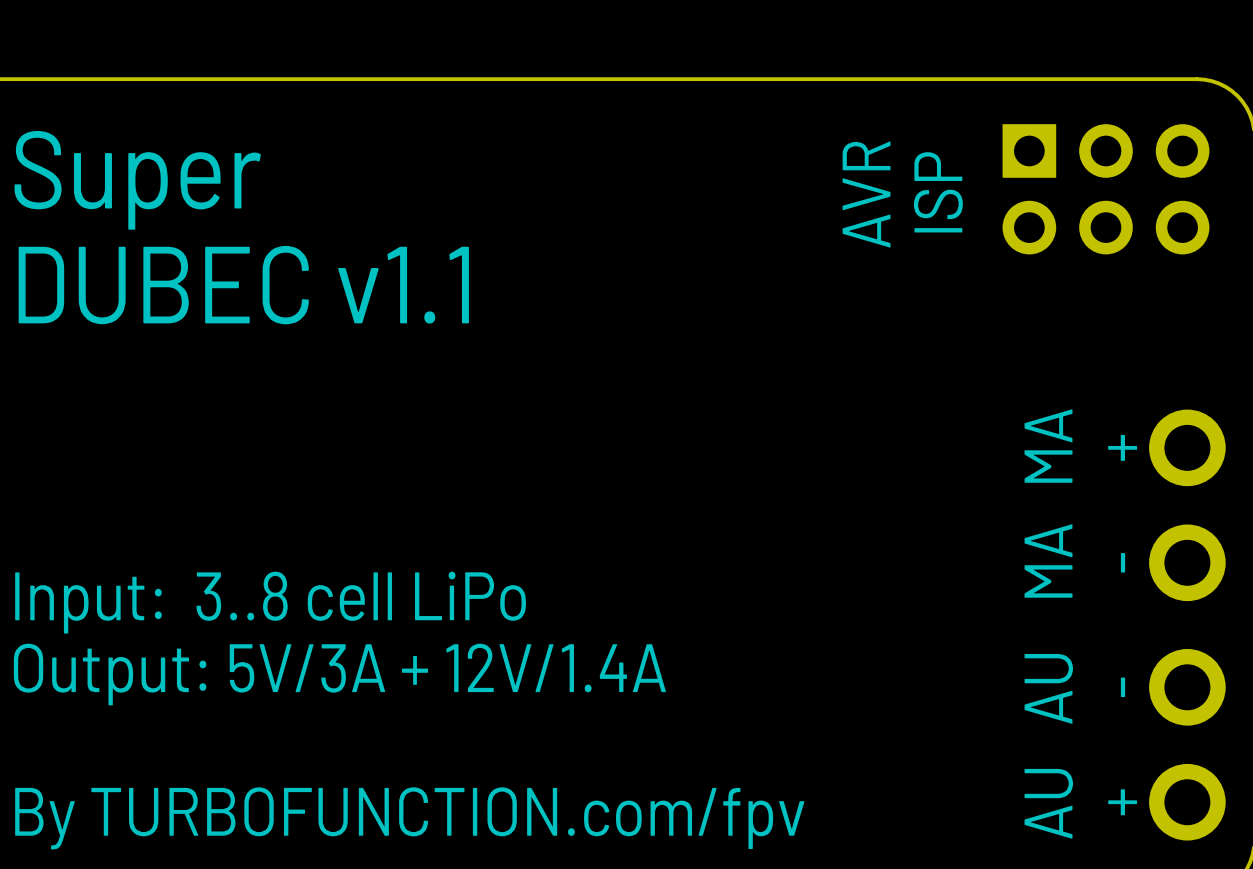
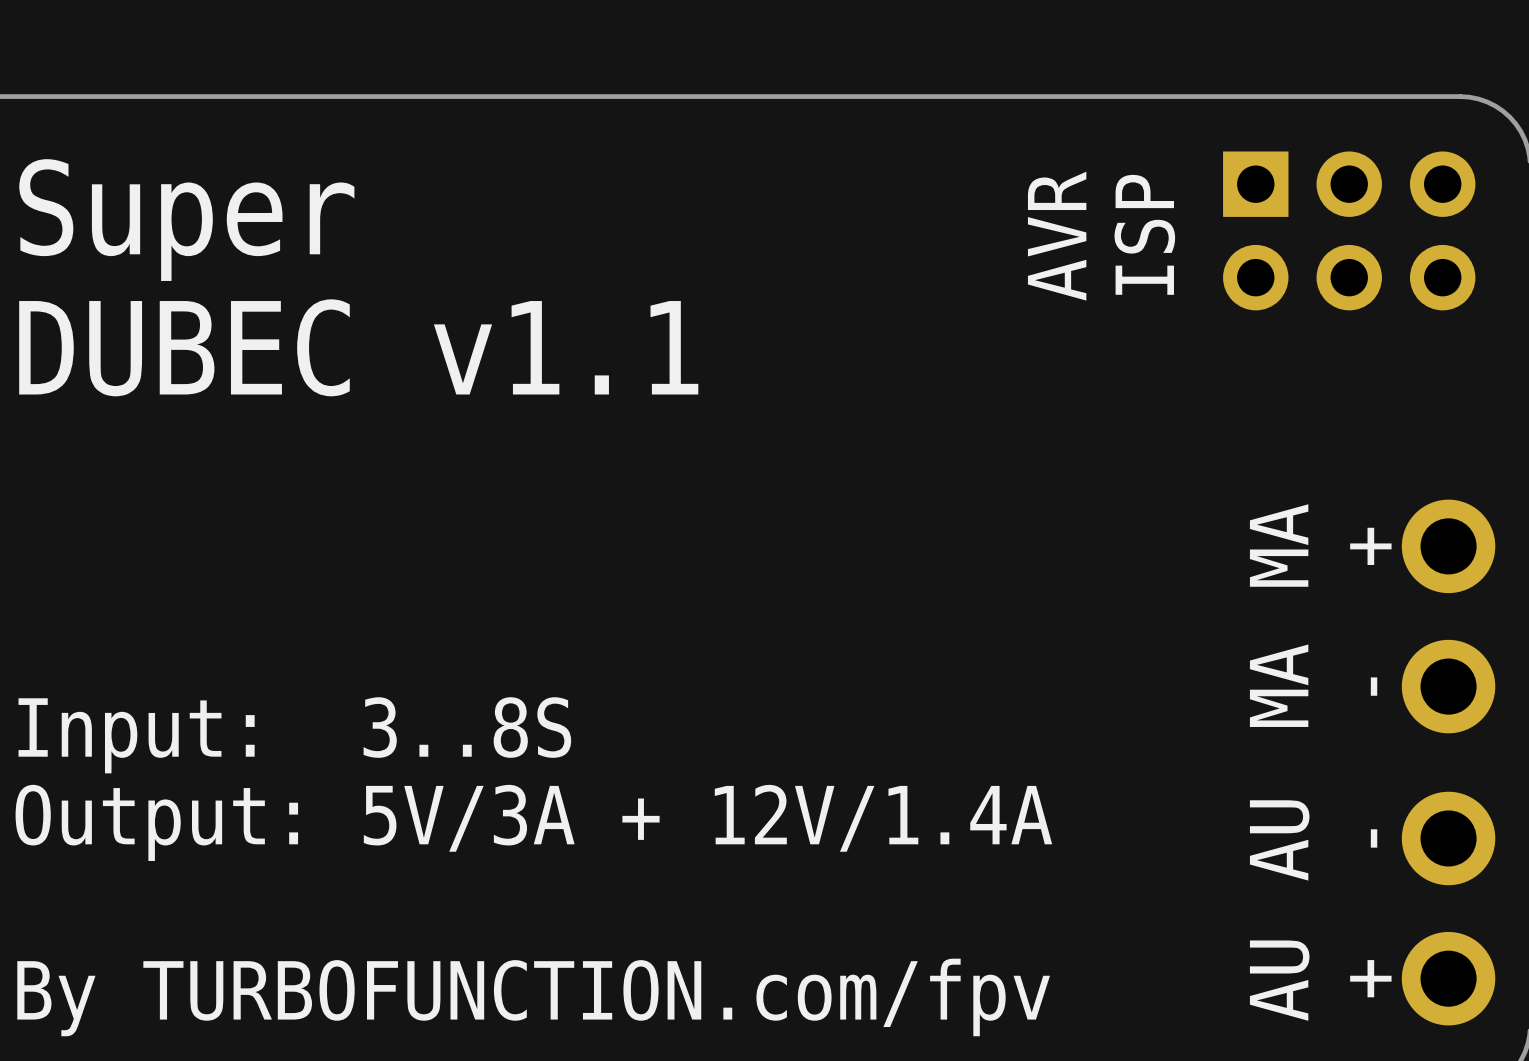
text: Input: 3..8 cell LiPo (270, 602) -> Input: 3..8S (294, 735)

